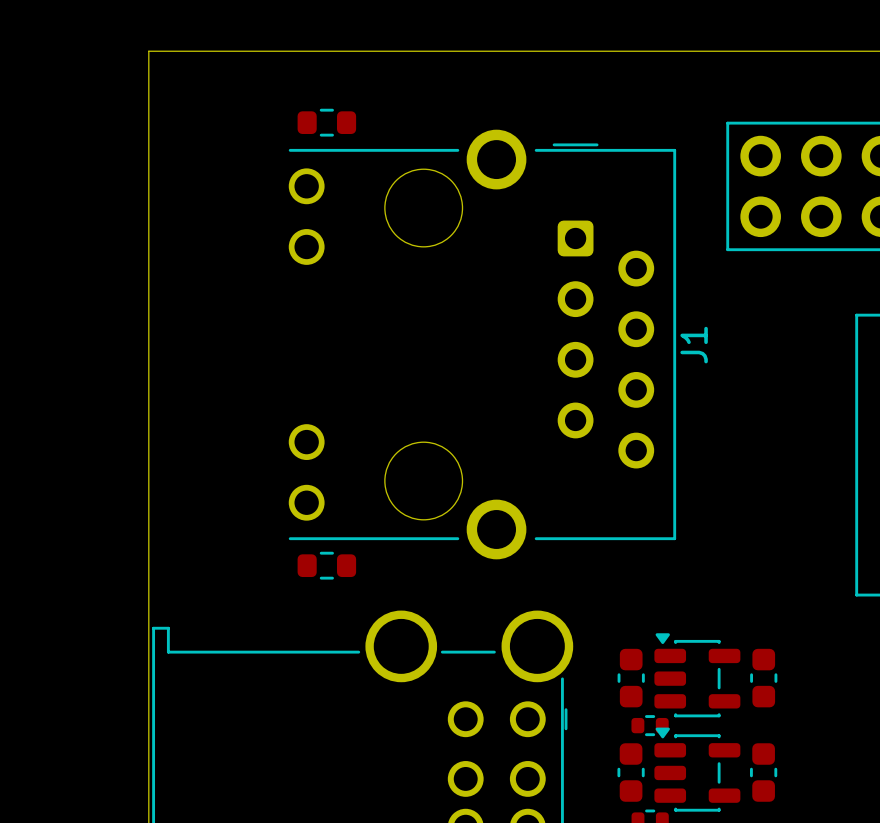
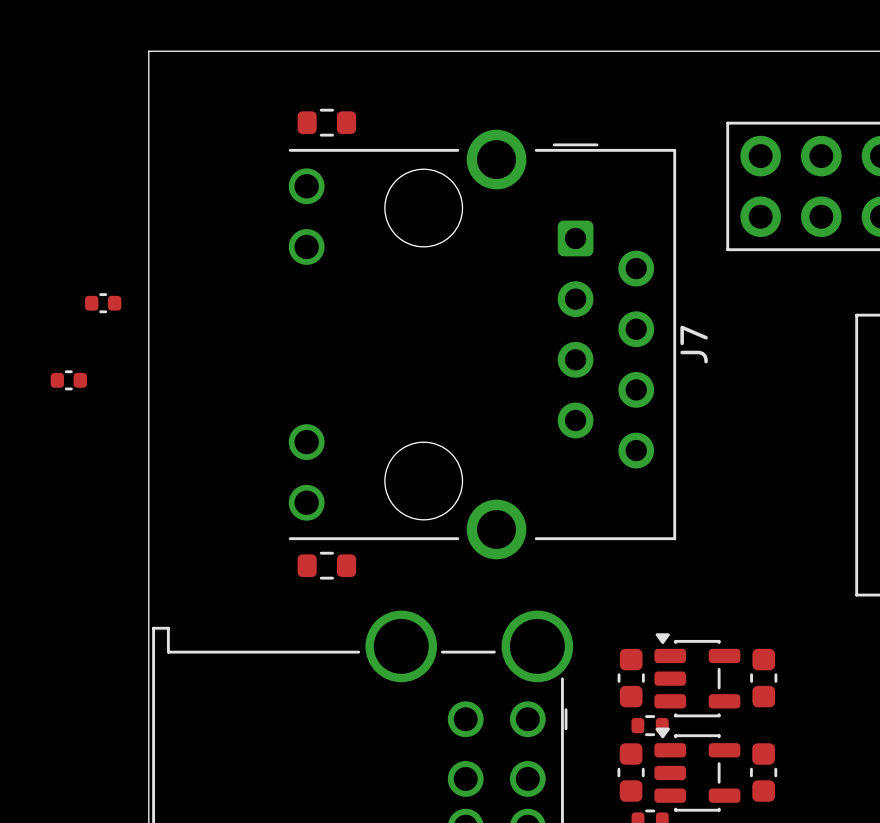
part: none -> (103, 303)
J1 name: J1 (694, 345) -> J7 (694, 344)
part: none -> (68, 380)

